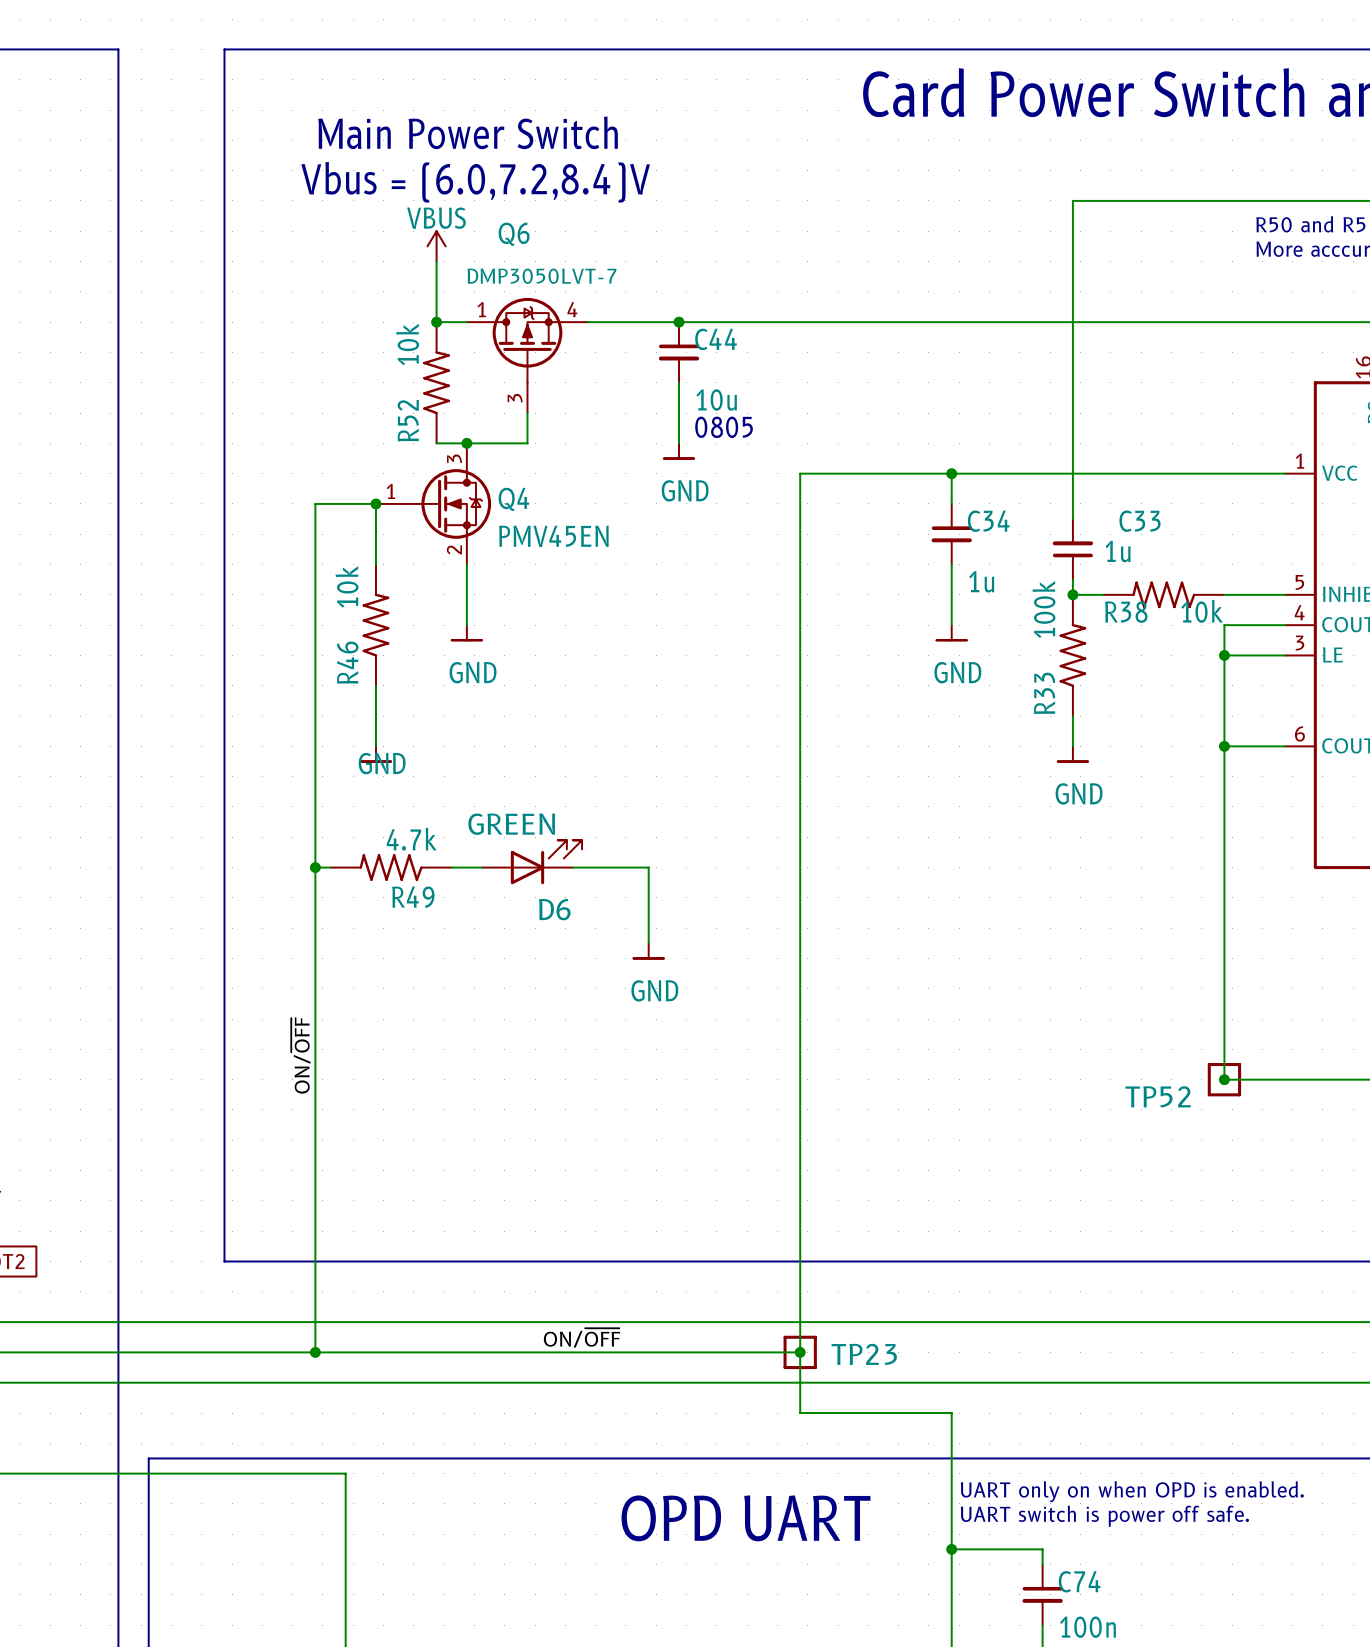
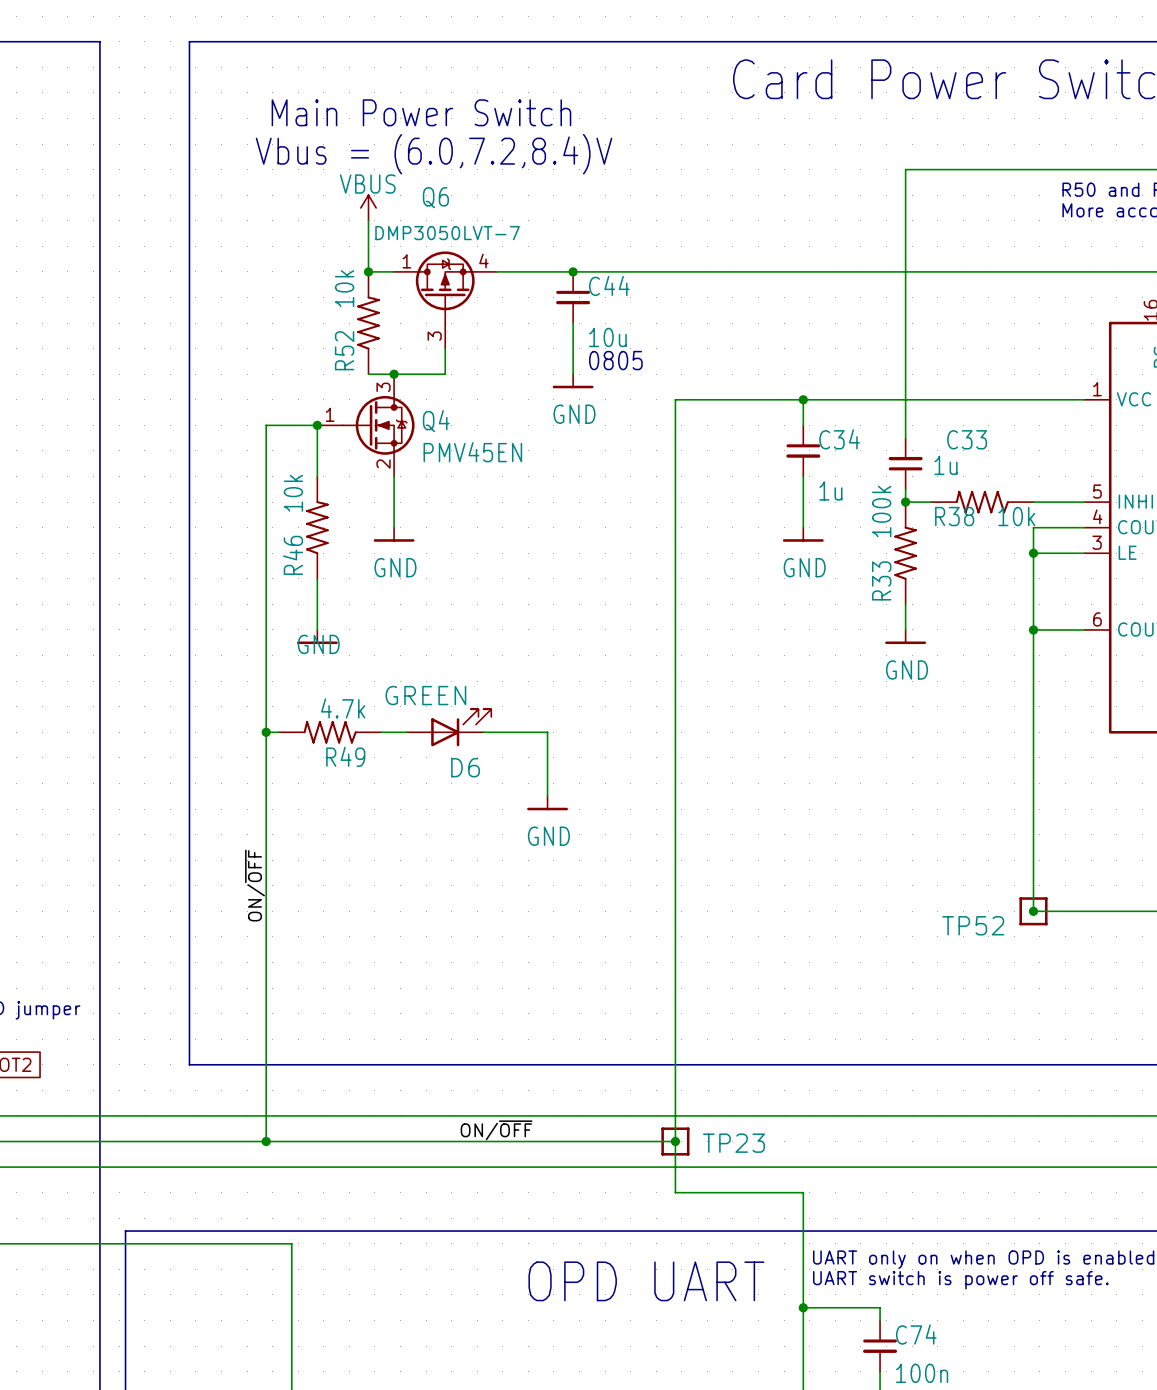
power symbol shape: [663, 443, 695, 459] -> [552, 374, 594, 389]
power symbol shape: [451, 625, 483, 641] -> [373, 527, 415, 542]
power symbol shape: [936, 625, 967, 641] -> [782, 527, 824, 542]
power symbol shape: [360, 746, 392, 762] -> [296, 629, 338, 645]
power symbol shape: [1057, 746, 1089, 762] -> [885, 629, 927, 645]
power symbol shape: [633, 943, 664, 959] -> [527, 796, 569, 811]

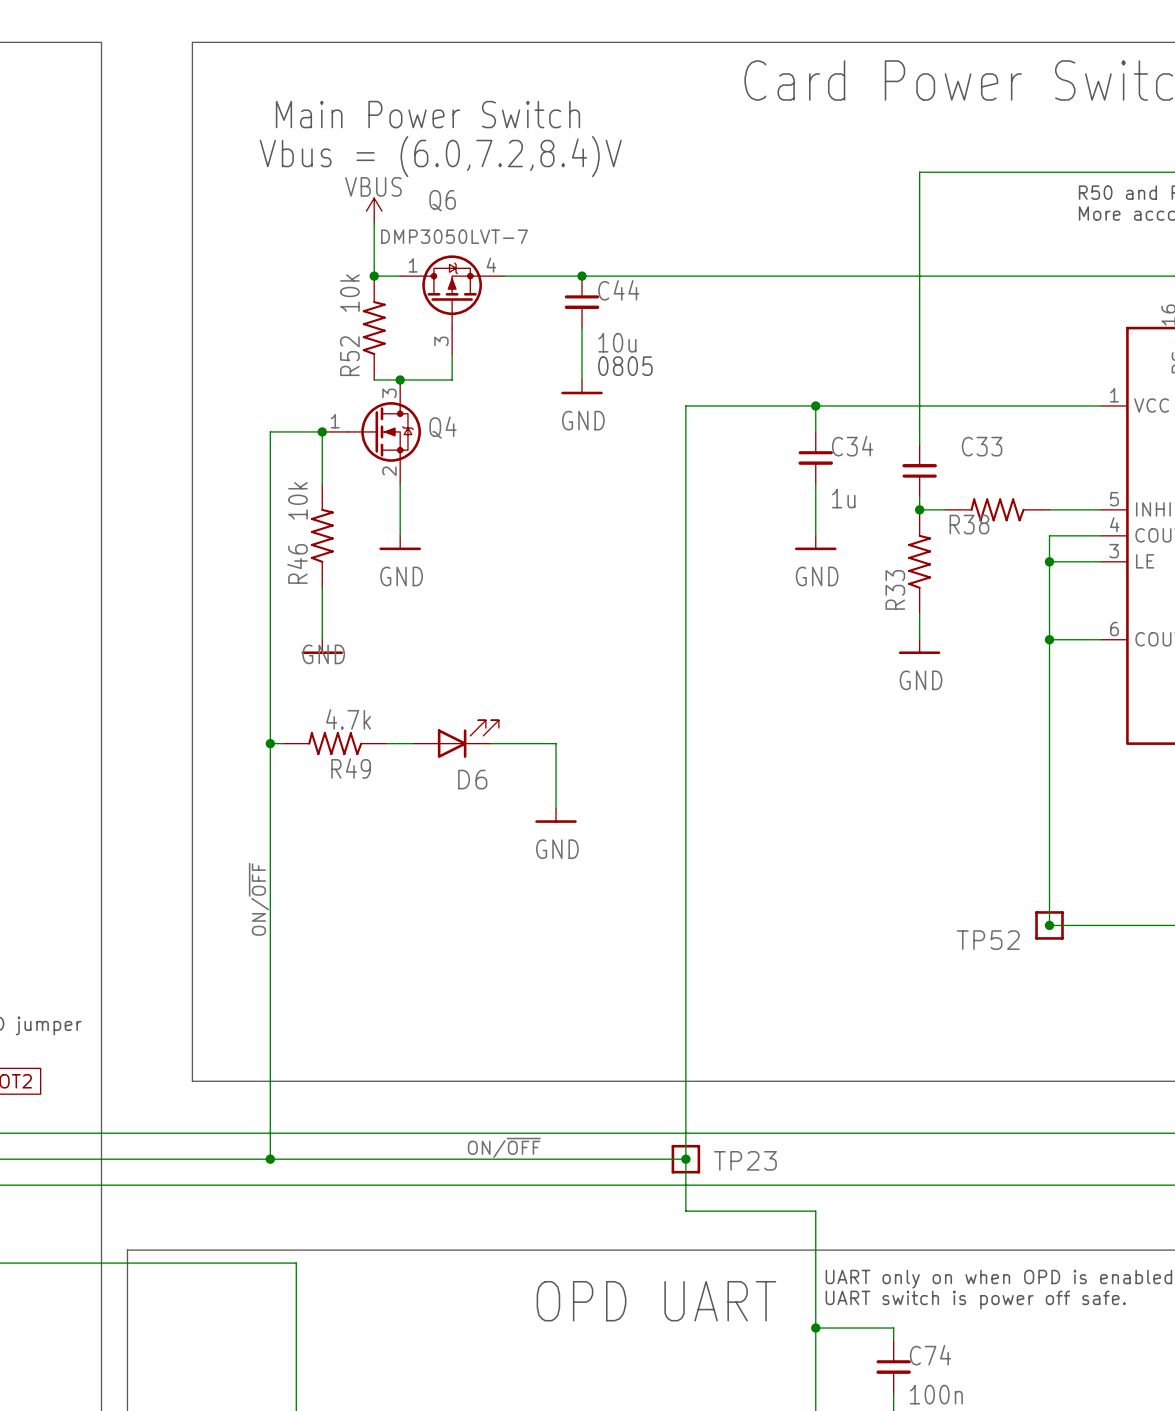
Q4 value: PMV45EN (472, 452) -> none
C33 value: 1u (945, 465) -> none
R33 value: 100k (881, 511) -> none
R38 value: 10k (1016, 516) -> none
D6 value: GREEN (425, 695) -> none

